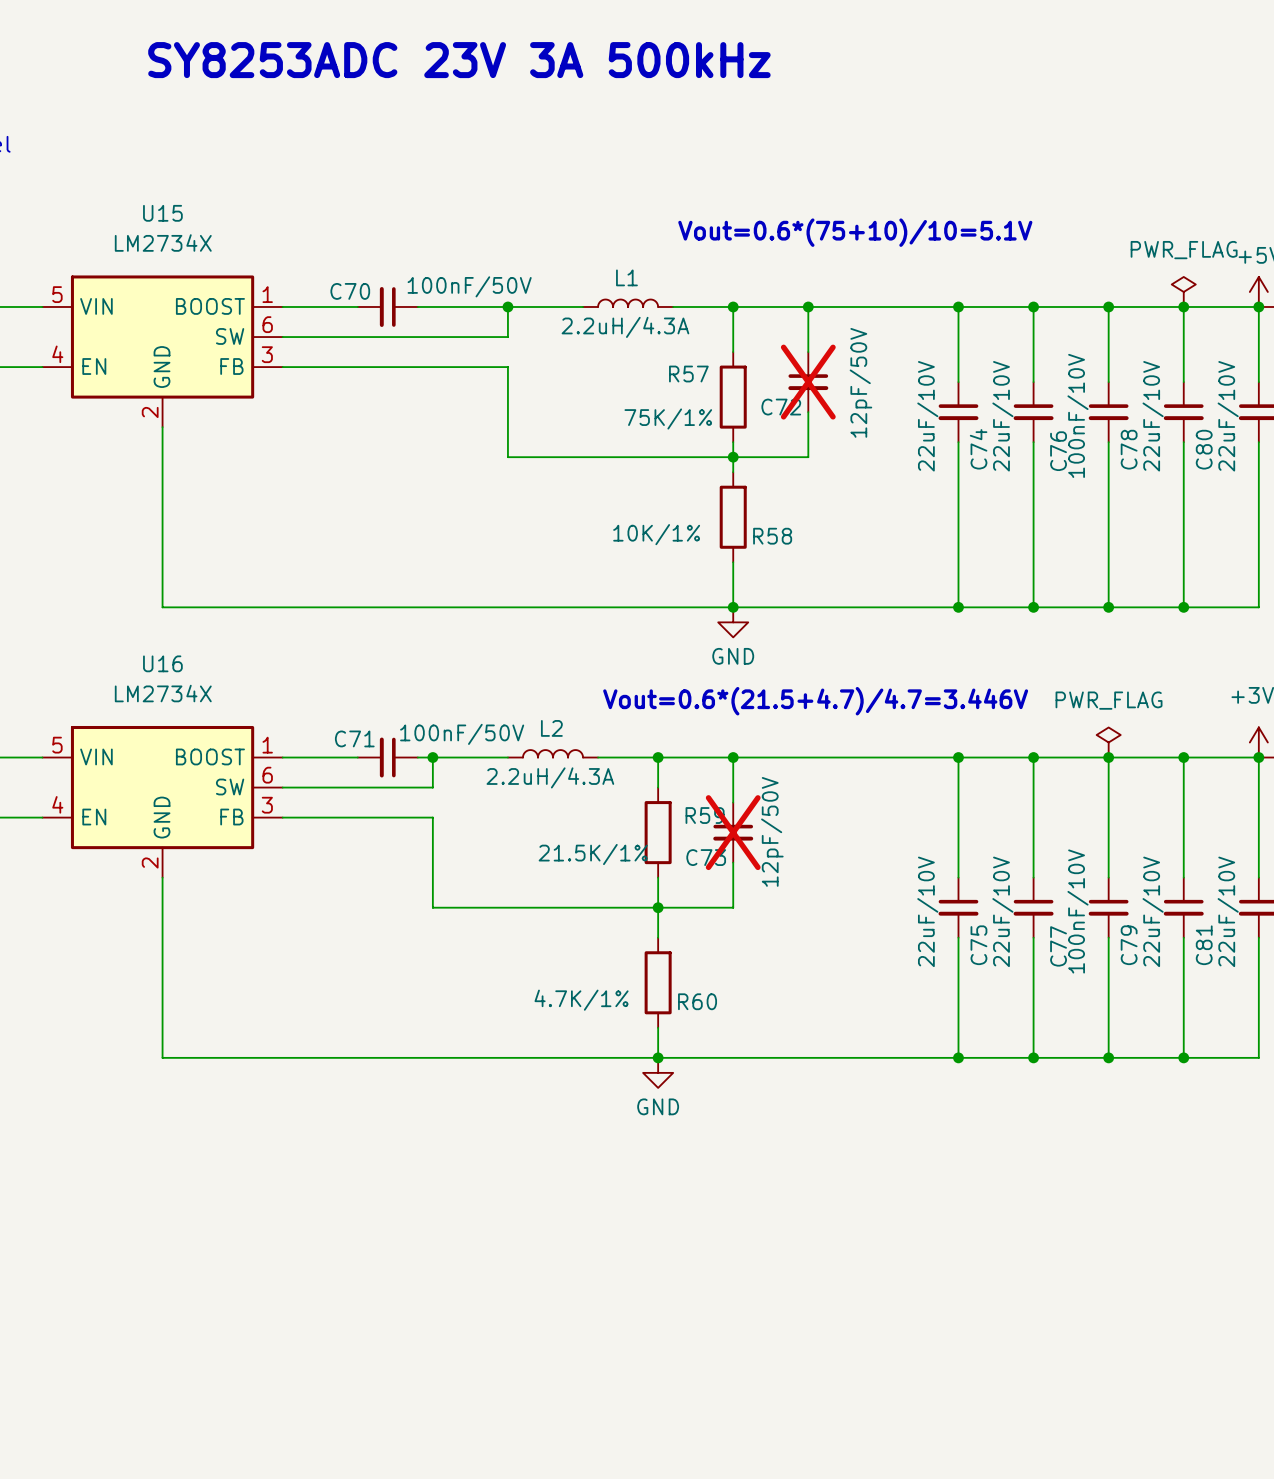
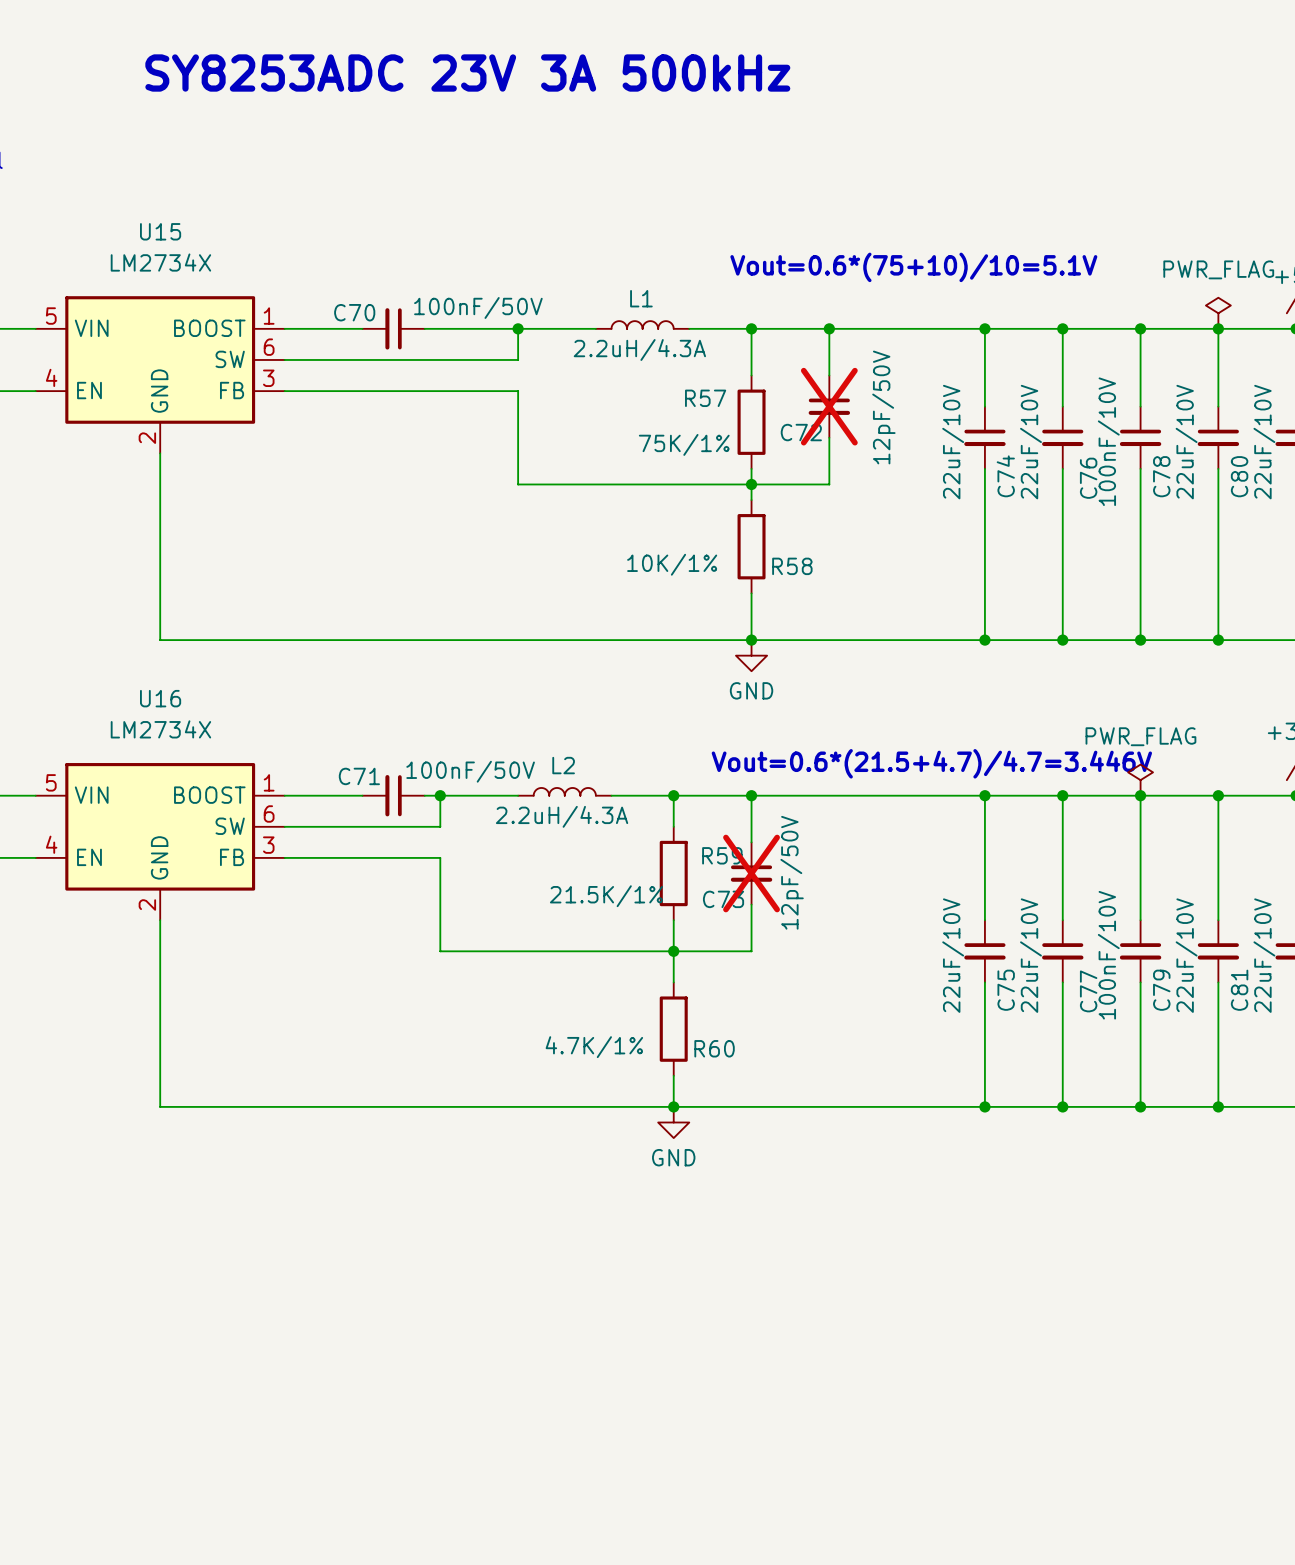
text position: Vout=0.6*(75+10)/10=5.1V (855, 232) -> Vout=0.6*(75+10)/10=5.1V (913, 267)
text position: Vout=0.6*(21.5+4.7)/4.7=3.446V (815, 701) -> Vout=0.6*(21.5+4.7)/4.7=3.446V (931, 763)

